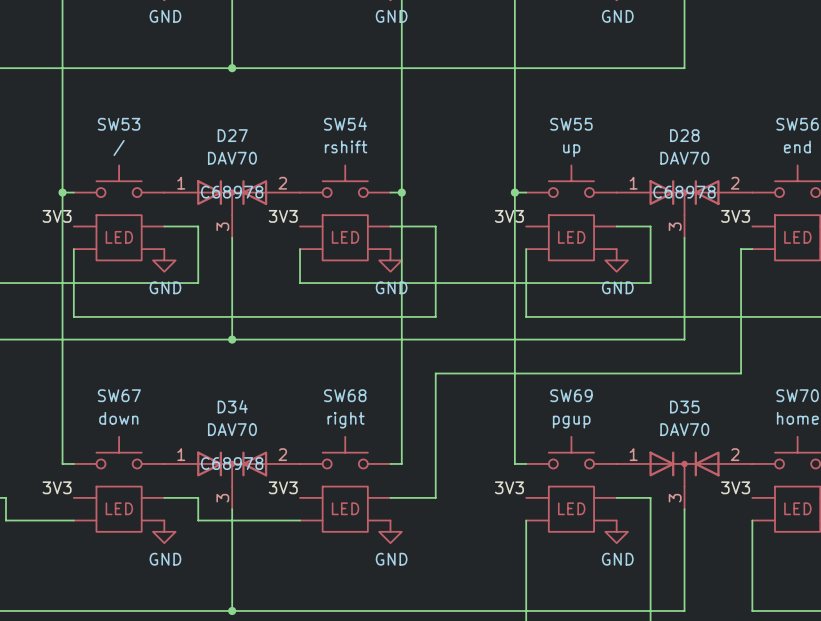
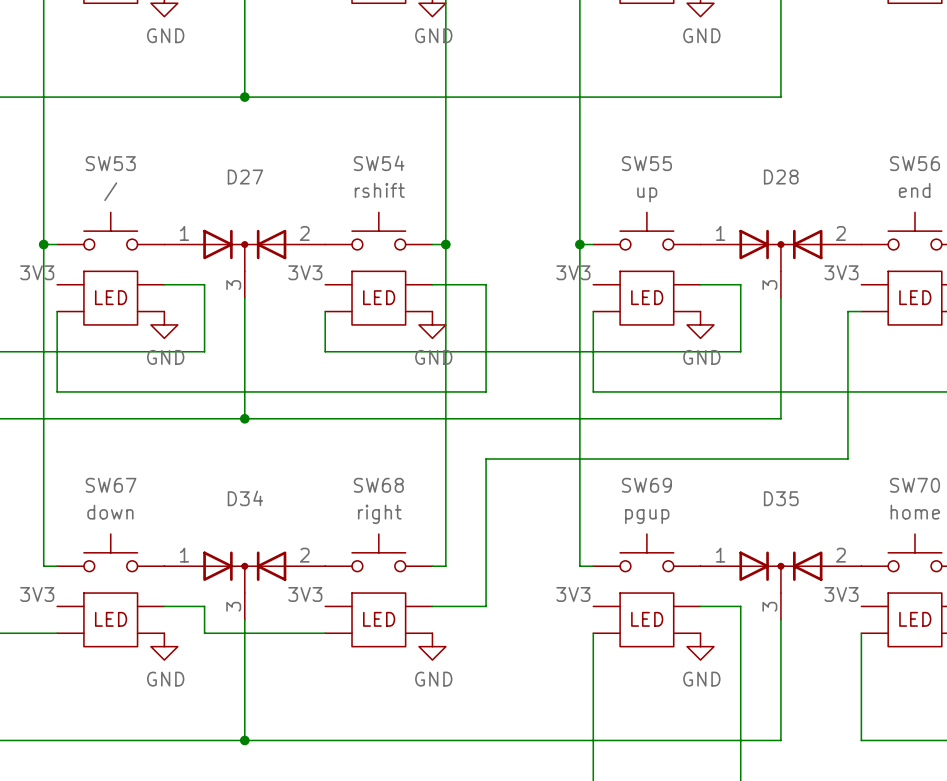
D27 value: DAV70 (232, 158) -> none
D28 value: DAV70 (684, 158) -> none
D27 text: C68978 (232, 192) -> none
D28 text: C68978 (684, 192) -> none
D34 value: DAV70 (232, 429) -> none
D35 value: DAV70 (684, 429) -> none
D34 text: C68978 (232, 463) -> none

